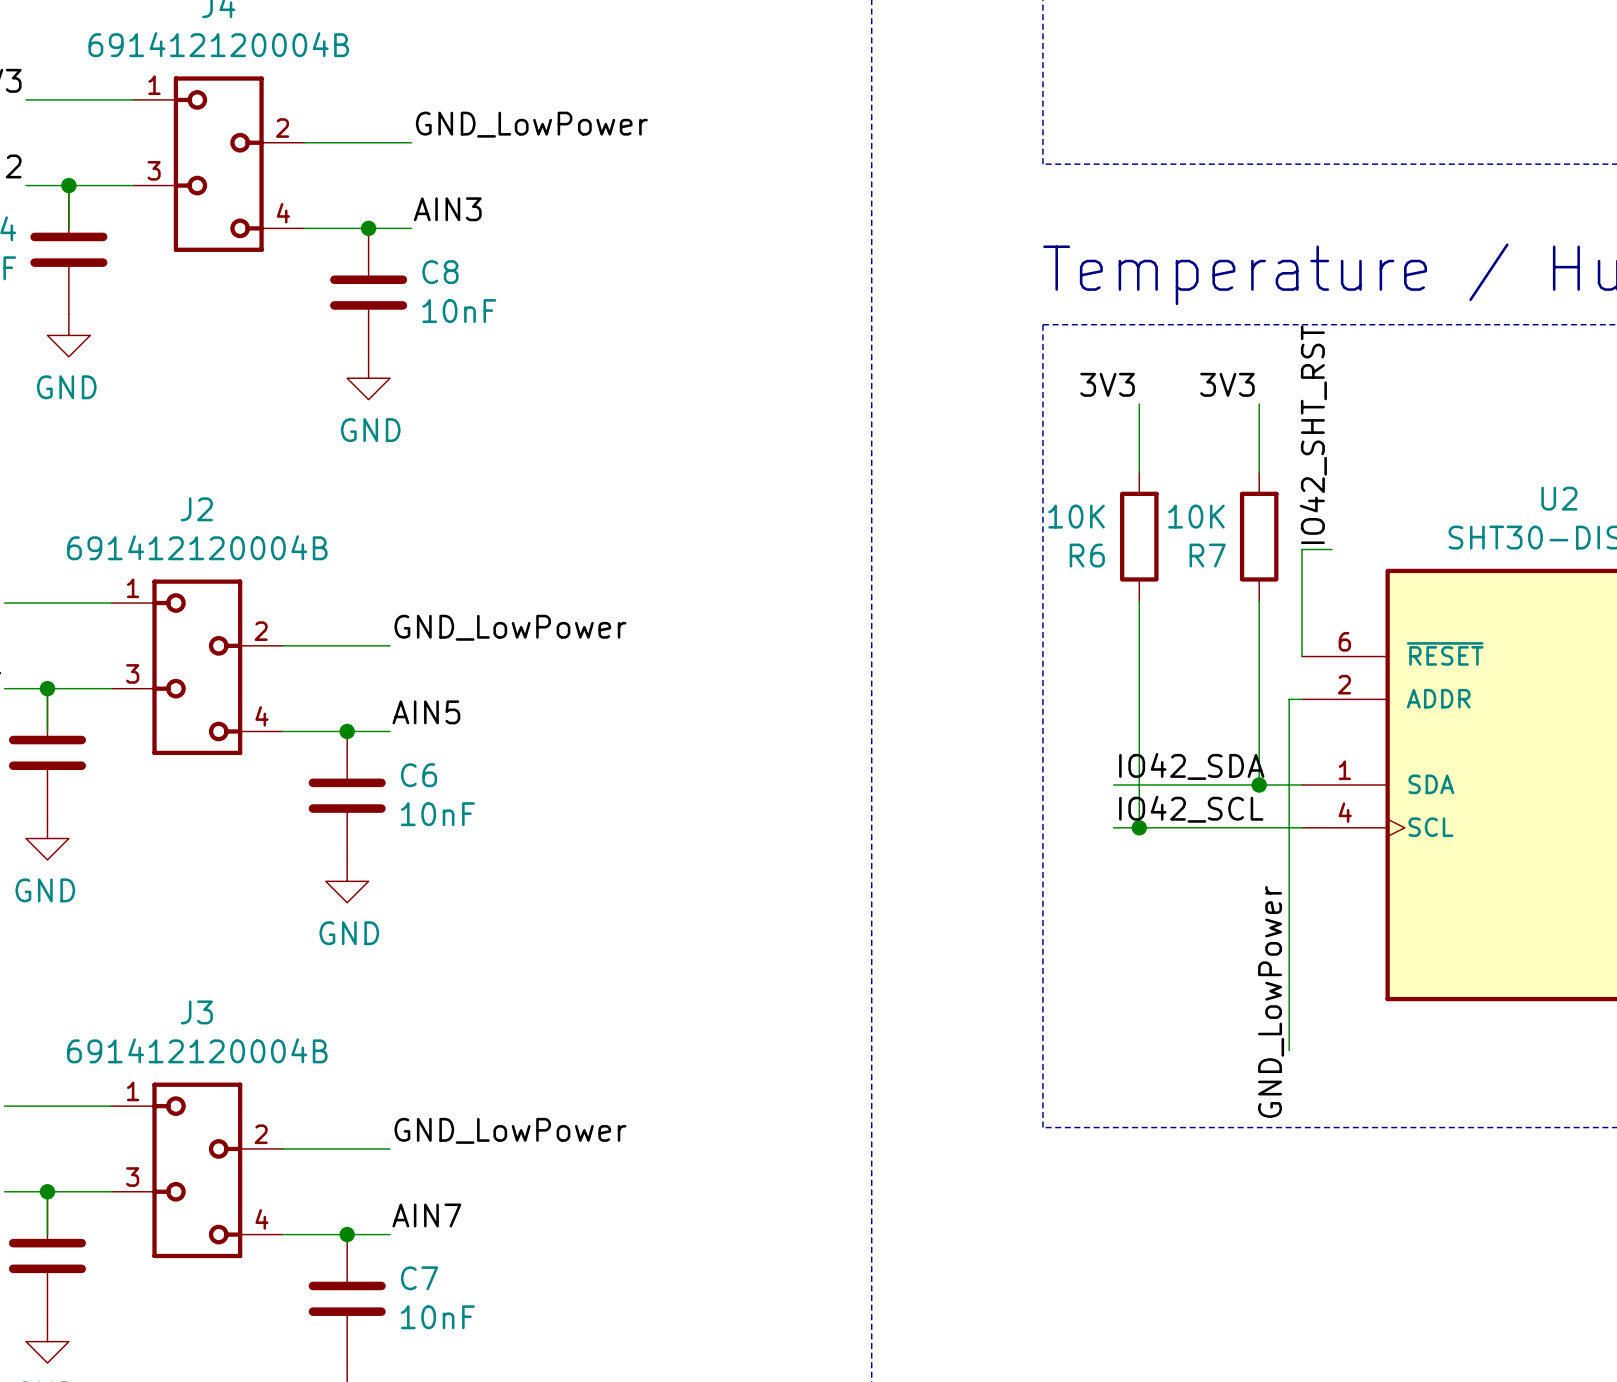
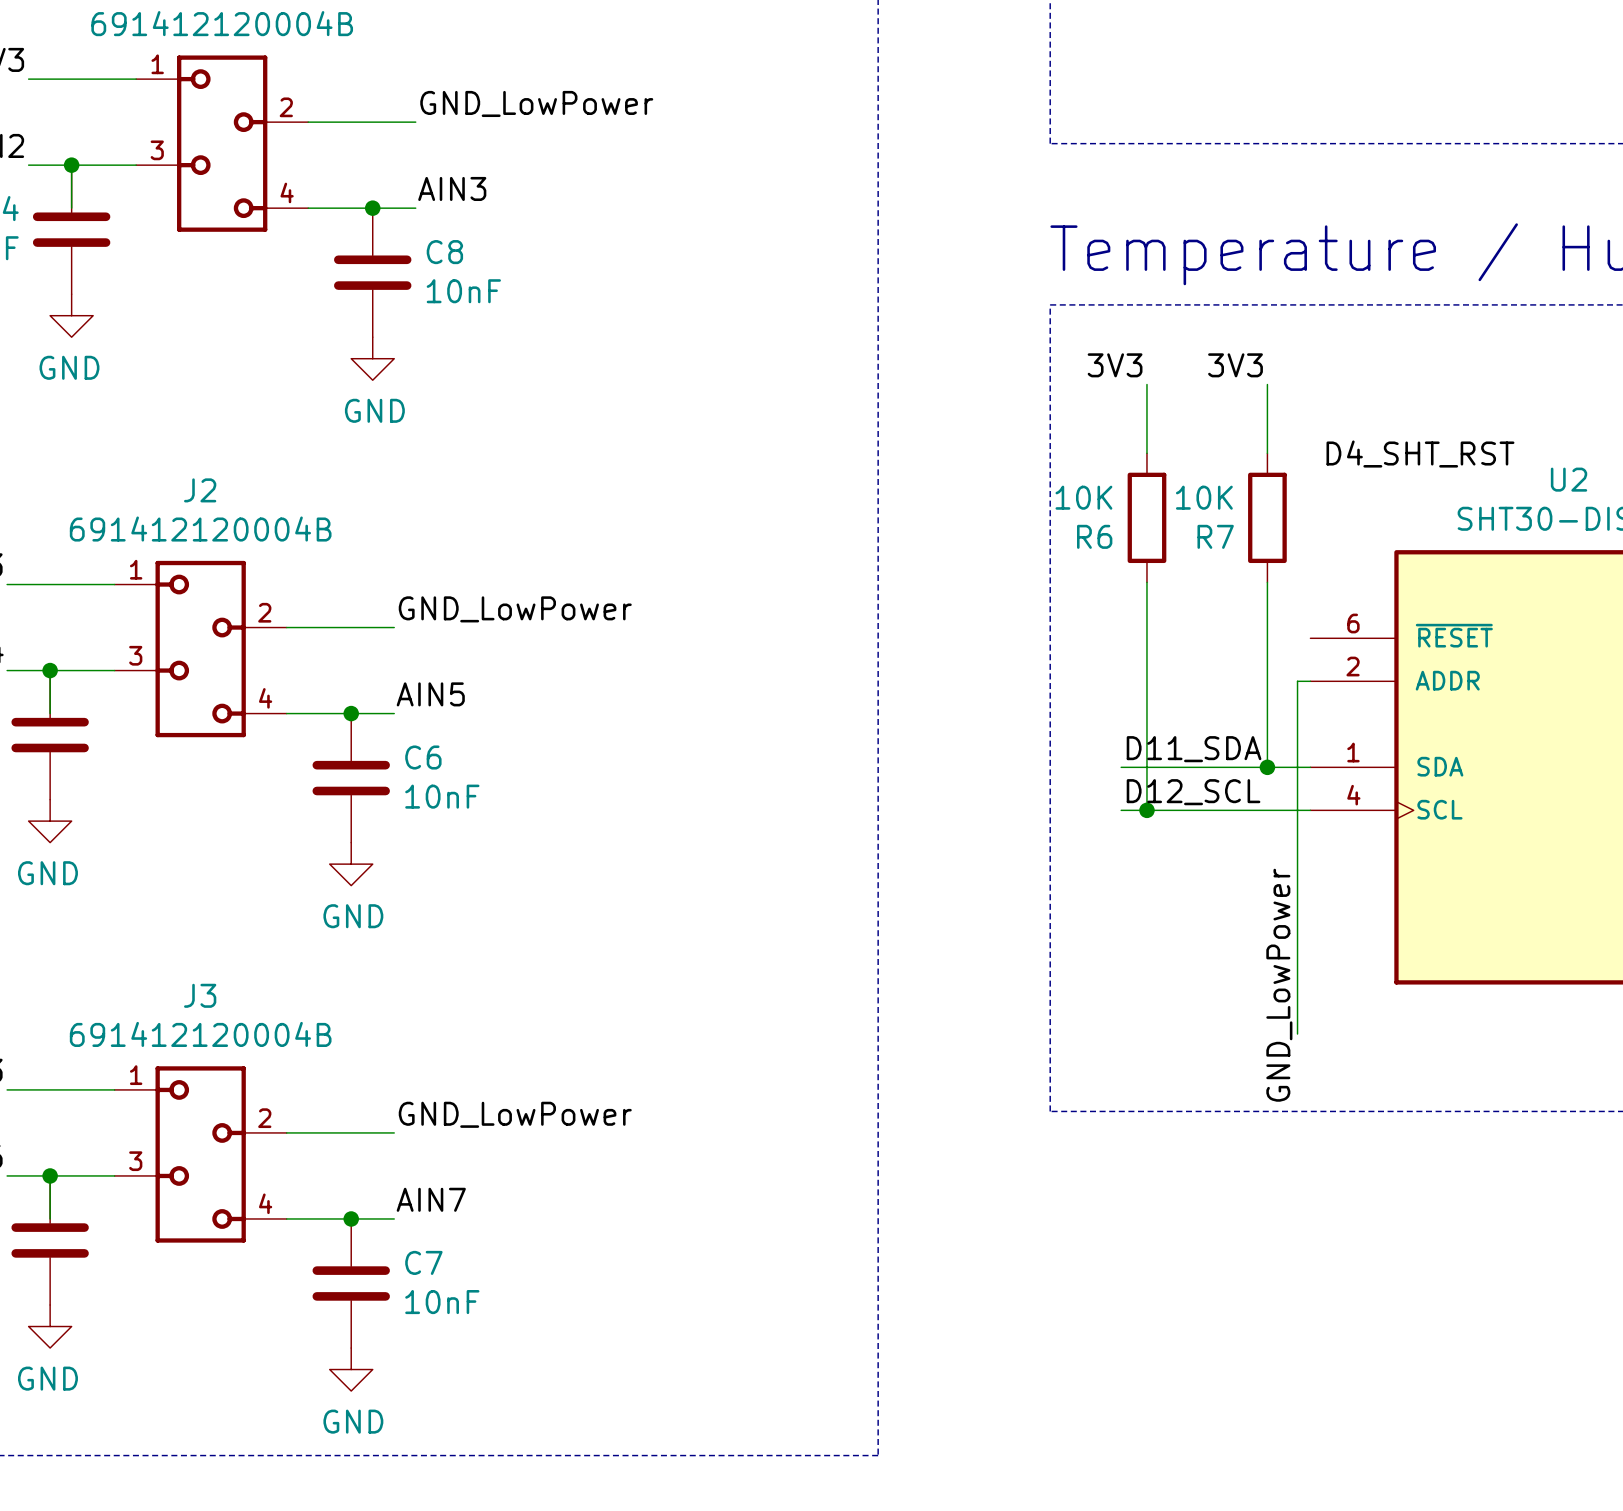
label: IO42_SHT_RST (1313, 434) -> D4_SHT_RST (1420, 454)
wire: (1331, 549) (1302, 549) (1302, 656) -> none
label: IO42_SDA (1191, 766) -> D11_SDA (1194, 749)
label: IO42_SCL (1191, 809) -> D12_SCL (1193, 792)

